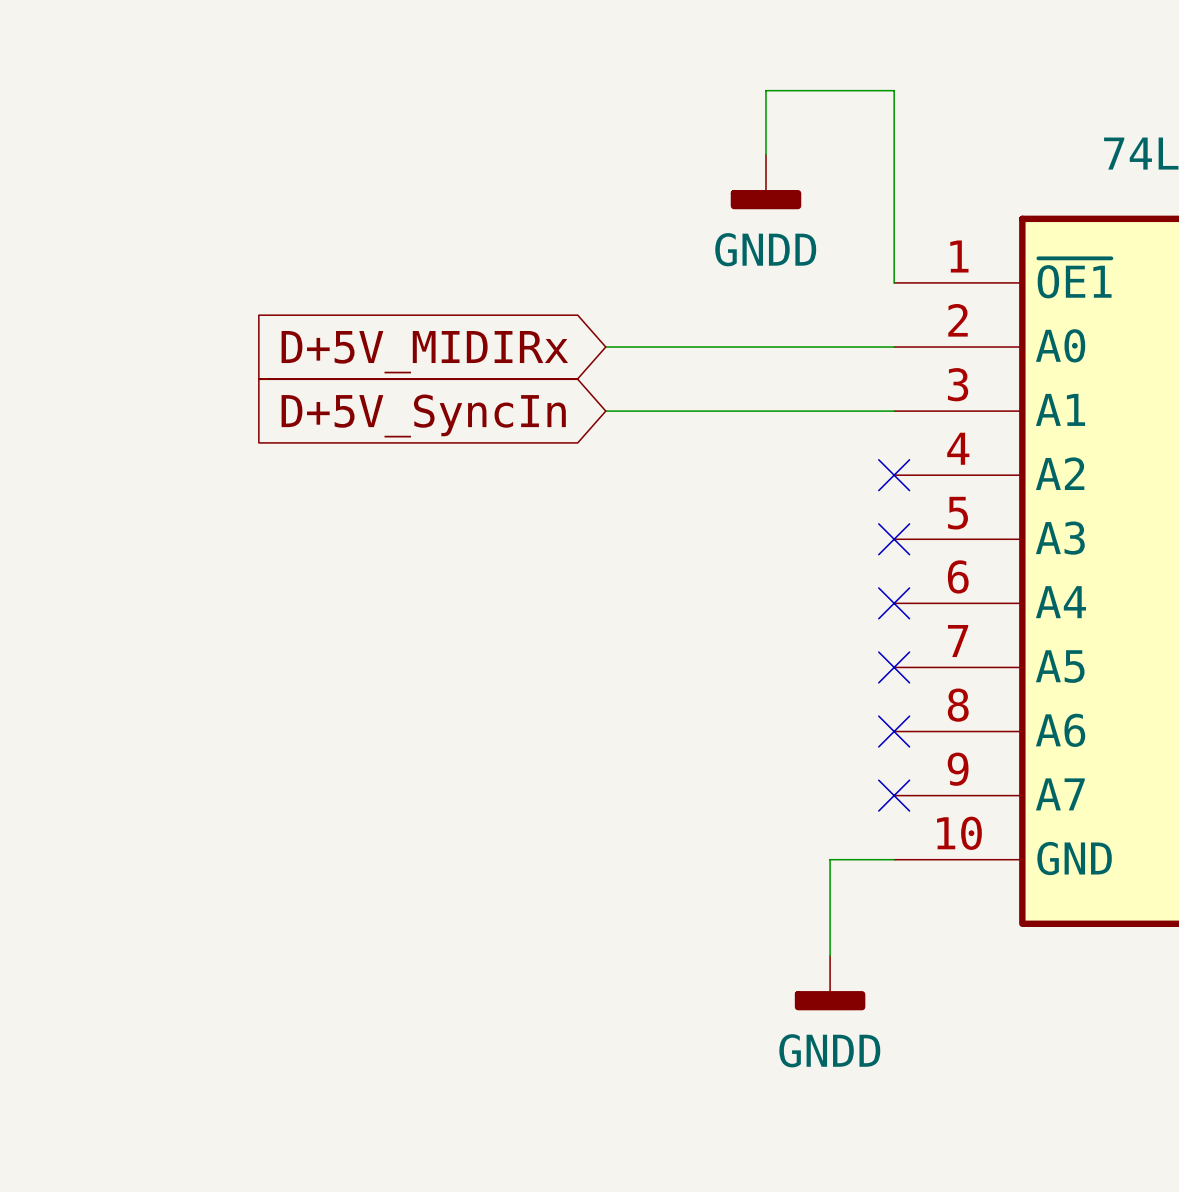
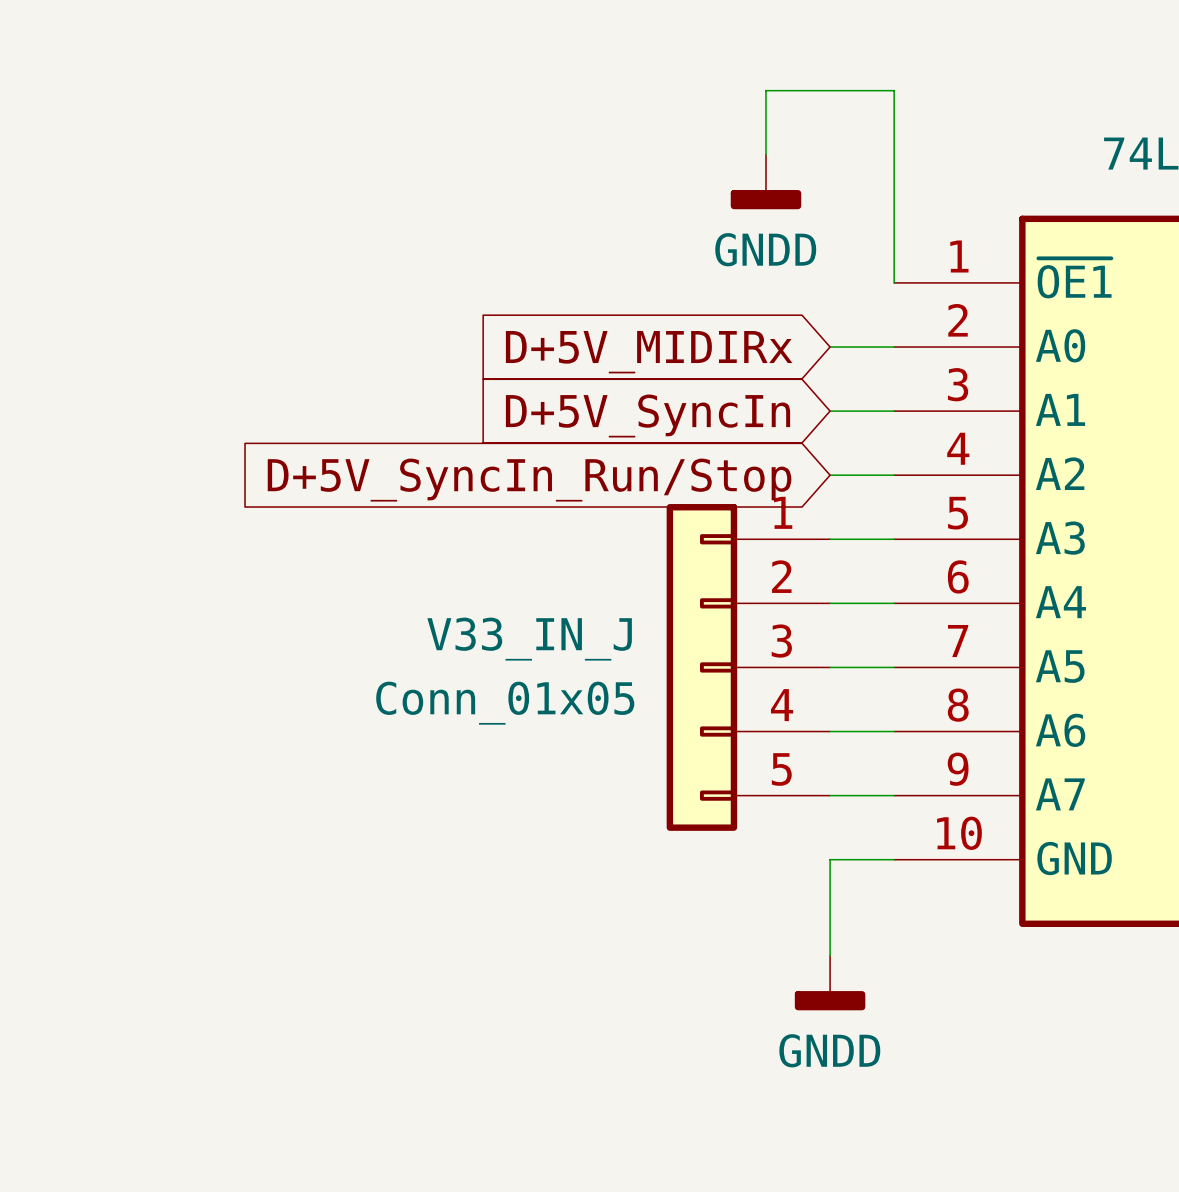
wire: (605, 347) (830, 347) -> none
global label position: D+5V_MIDIRx (424, 352) -> D+5V_MIDIRx (649, 352)
wire: (605, 411) (830, 411) -> none
global label position: D+5V_SyncIn (423, 415) -> D+5V_SyncIn (648, 415)
wire: none -> (830, 475) (894, 475)
no-connect mark: (894, 475) -> none
global label: none -> D+5V_SyncIn_Run/Stop (529, 480)
wire: none -> (830, 539) (894, 539)
no-connect mark: (894, 539) -> none
wire: none -> (830, 603) (894, 603)
no-connect mark: (894, 603) -> none
V33_IN_J: none -> Conn_01x05 (748, 667)
wire: none -> (830, 667) (894, 667)
no-connect mark: (894, 667) -> none
wire: none -> (830, 731) (894, 731)
no-connect mark: (894, 731) -> none
wire: none -> (830, 795) (894, 795)
no-connect mark: (894, 795) -> none

